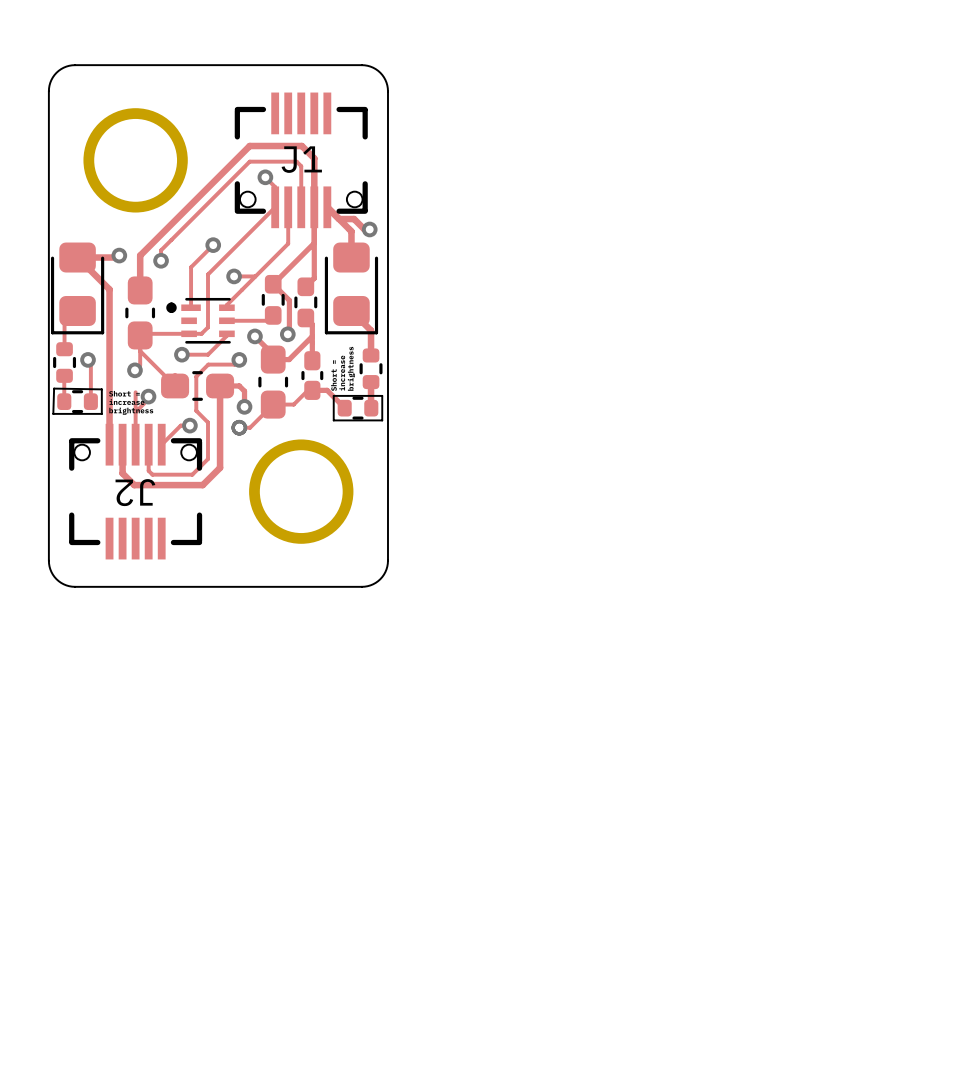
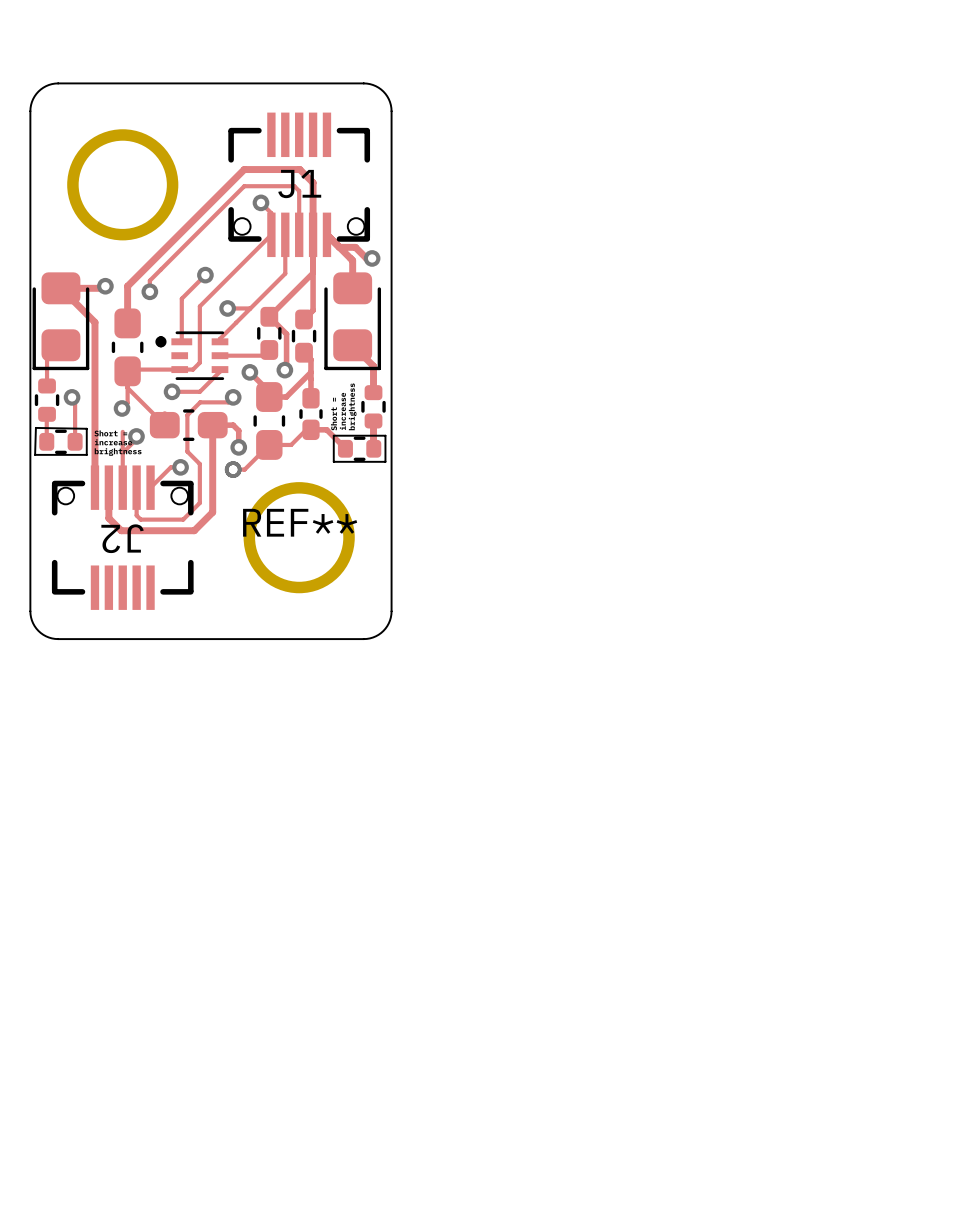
REF** name: none -> REF** (300, 522)

